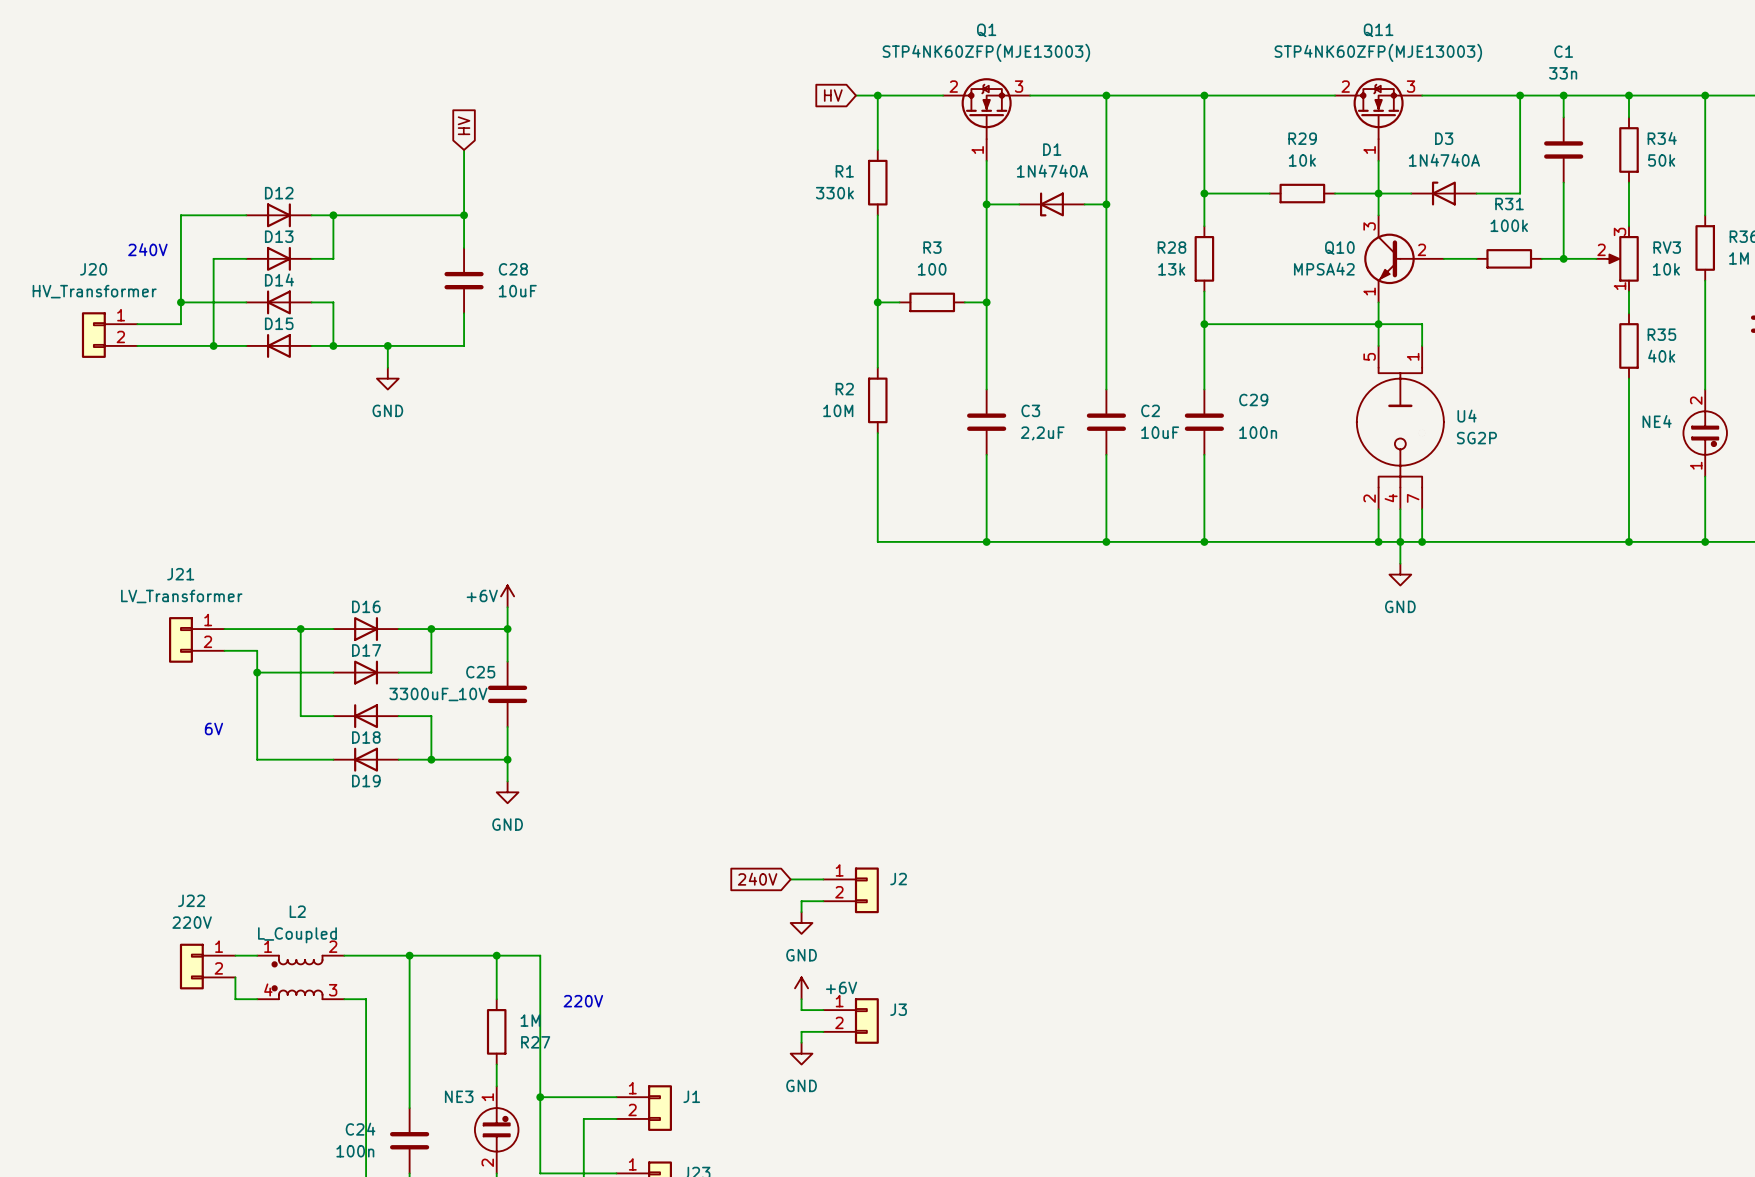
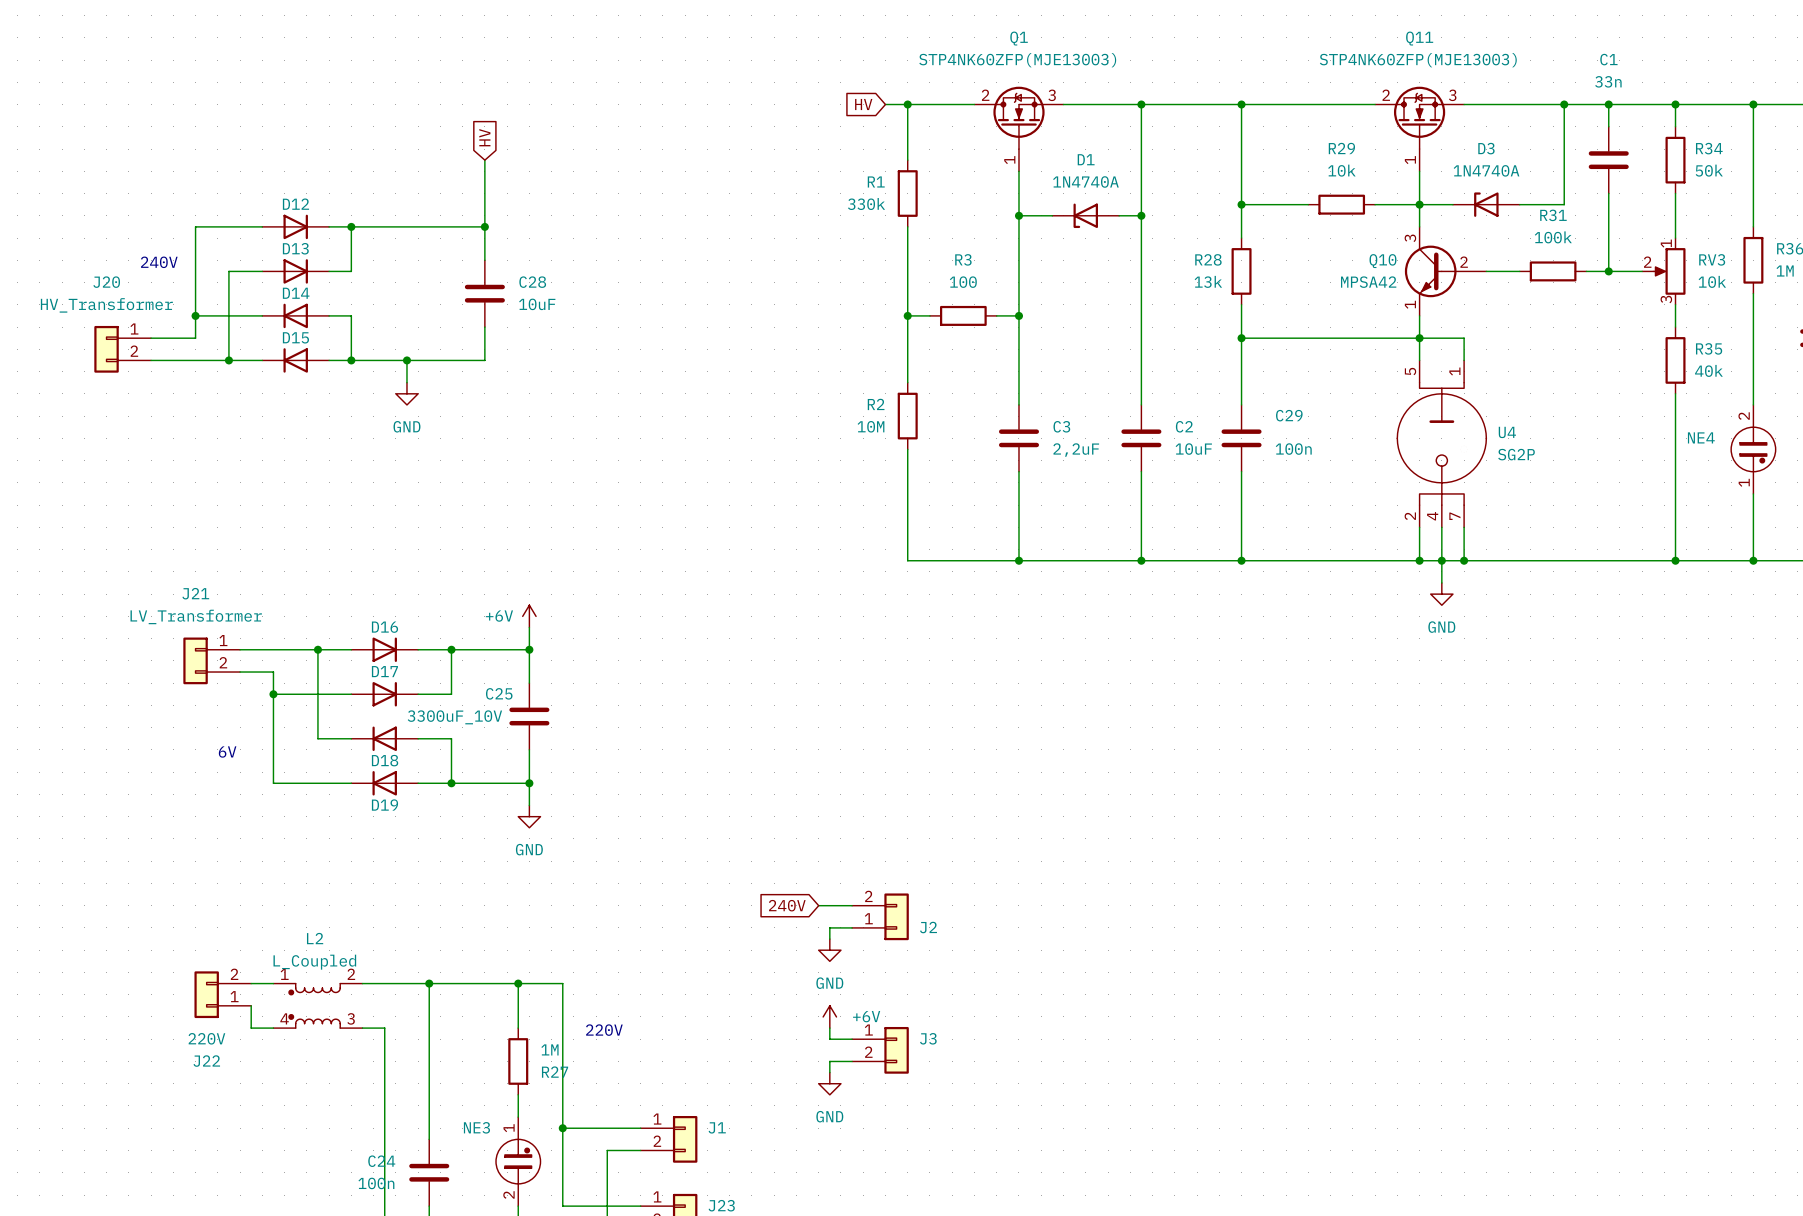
RV3 flip: as is (1623, 258) -> up-down (1669, 271)
J2 flip: as is (866, 890) -> up-down (896, 916)
J22 flip: as is (191, 966) -> up-down (206, 994)

